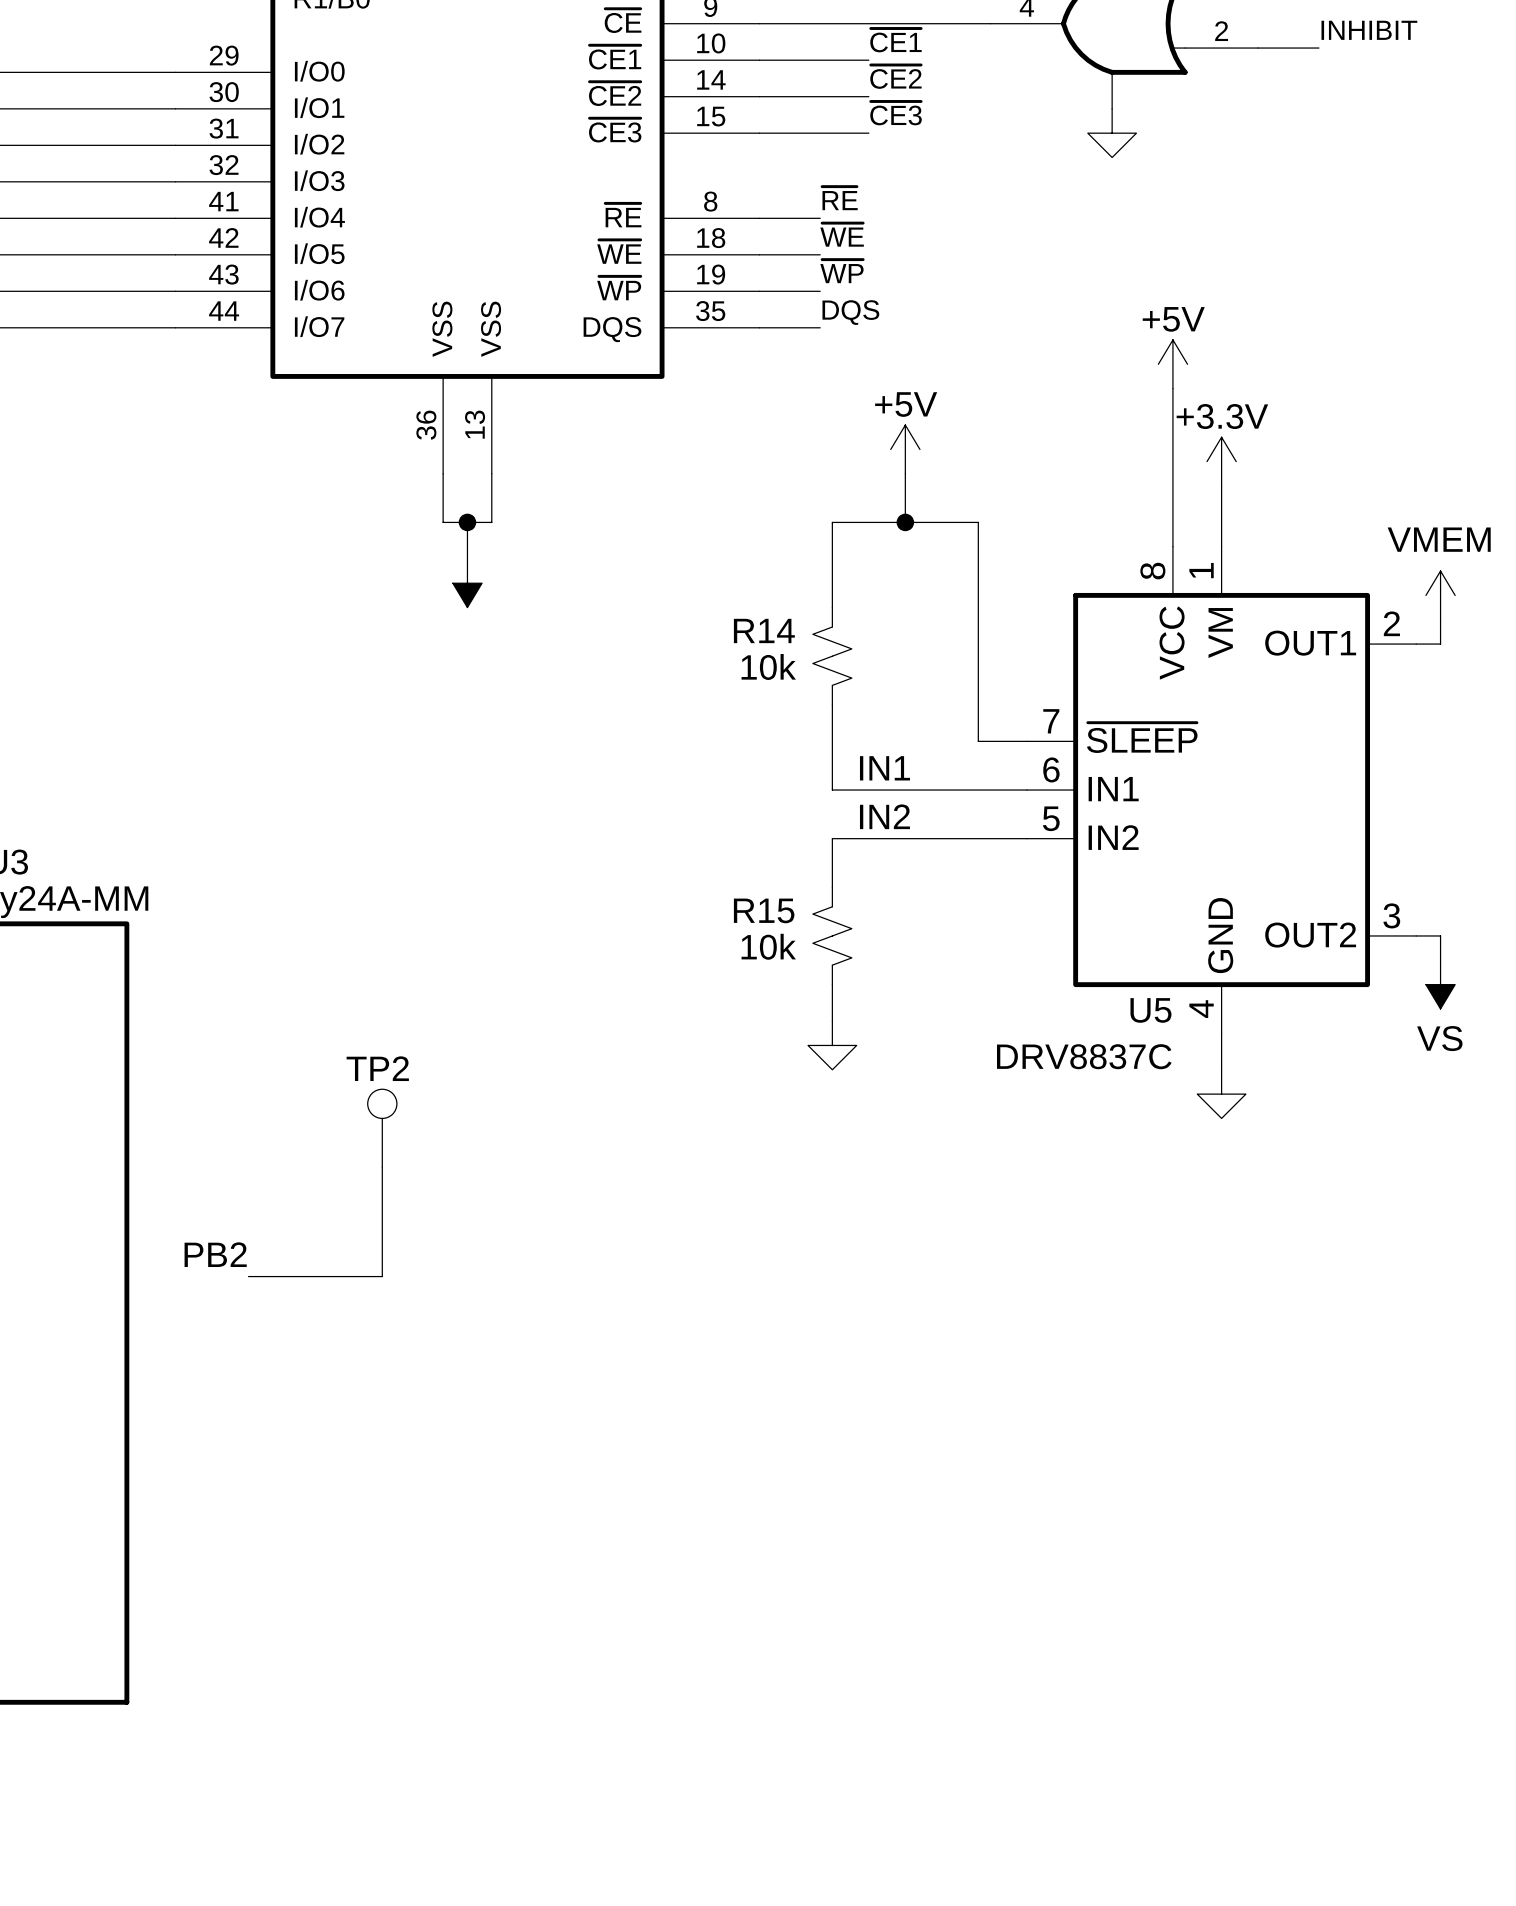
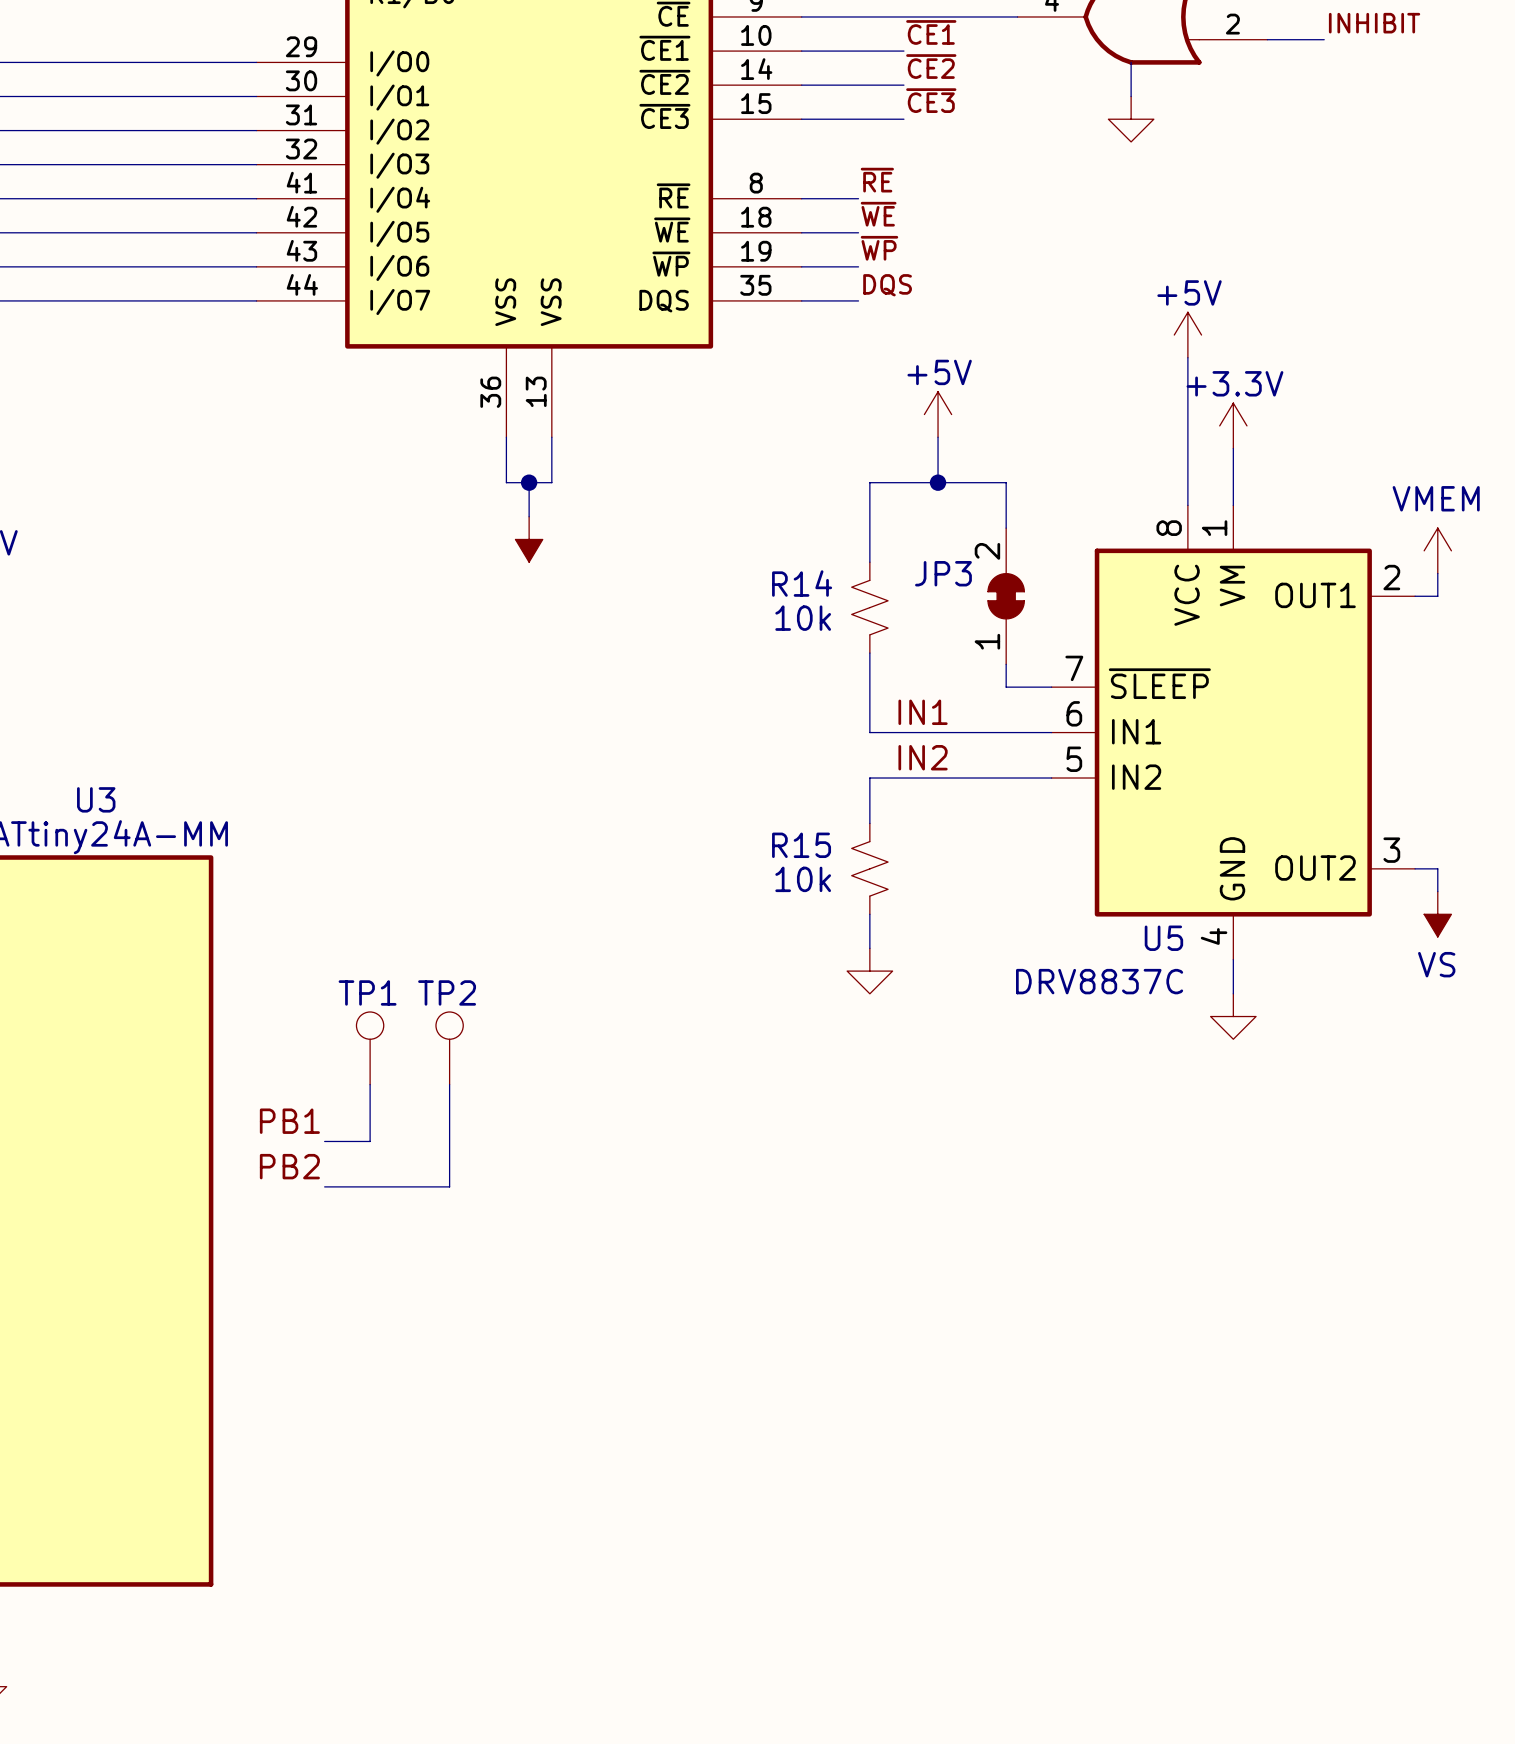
JP3: none -> (1006, 596)
TP1: none -> (370, 1048)
wire: none -> (370, 1084) (370, 1141) (324, 1141)
label: none -> PB1 (289, 1121)

